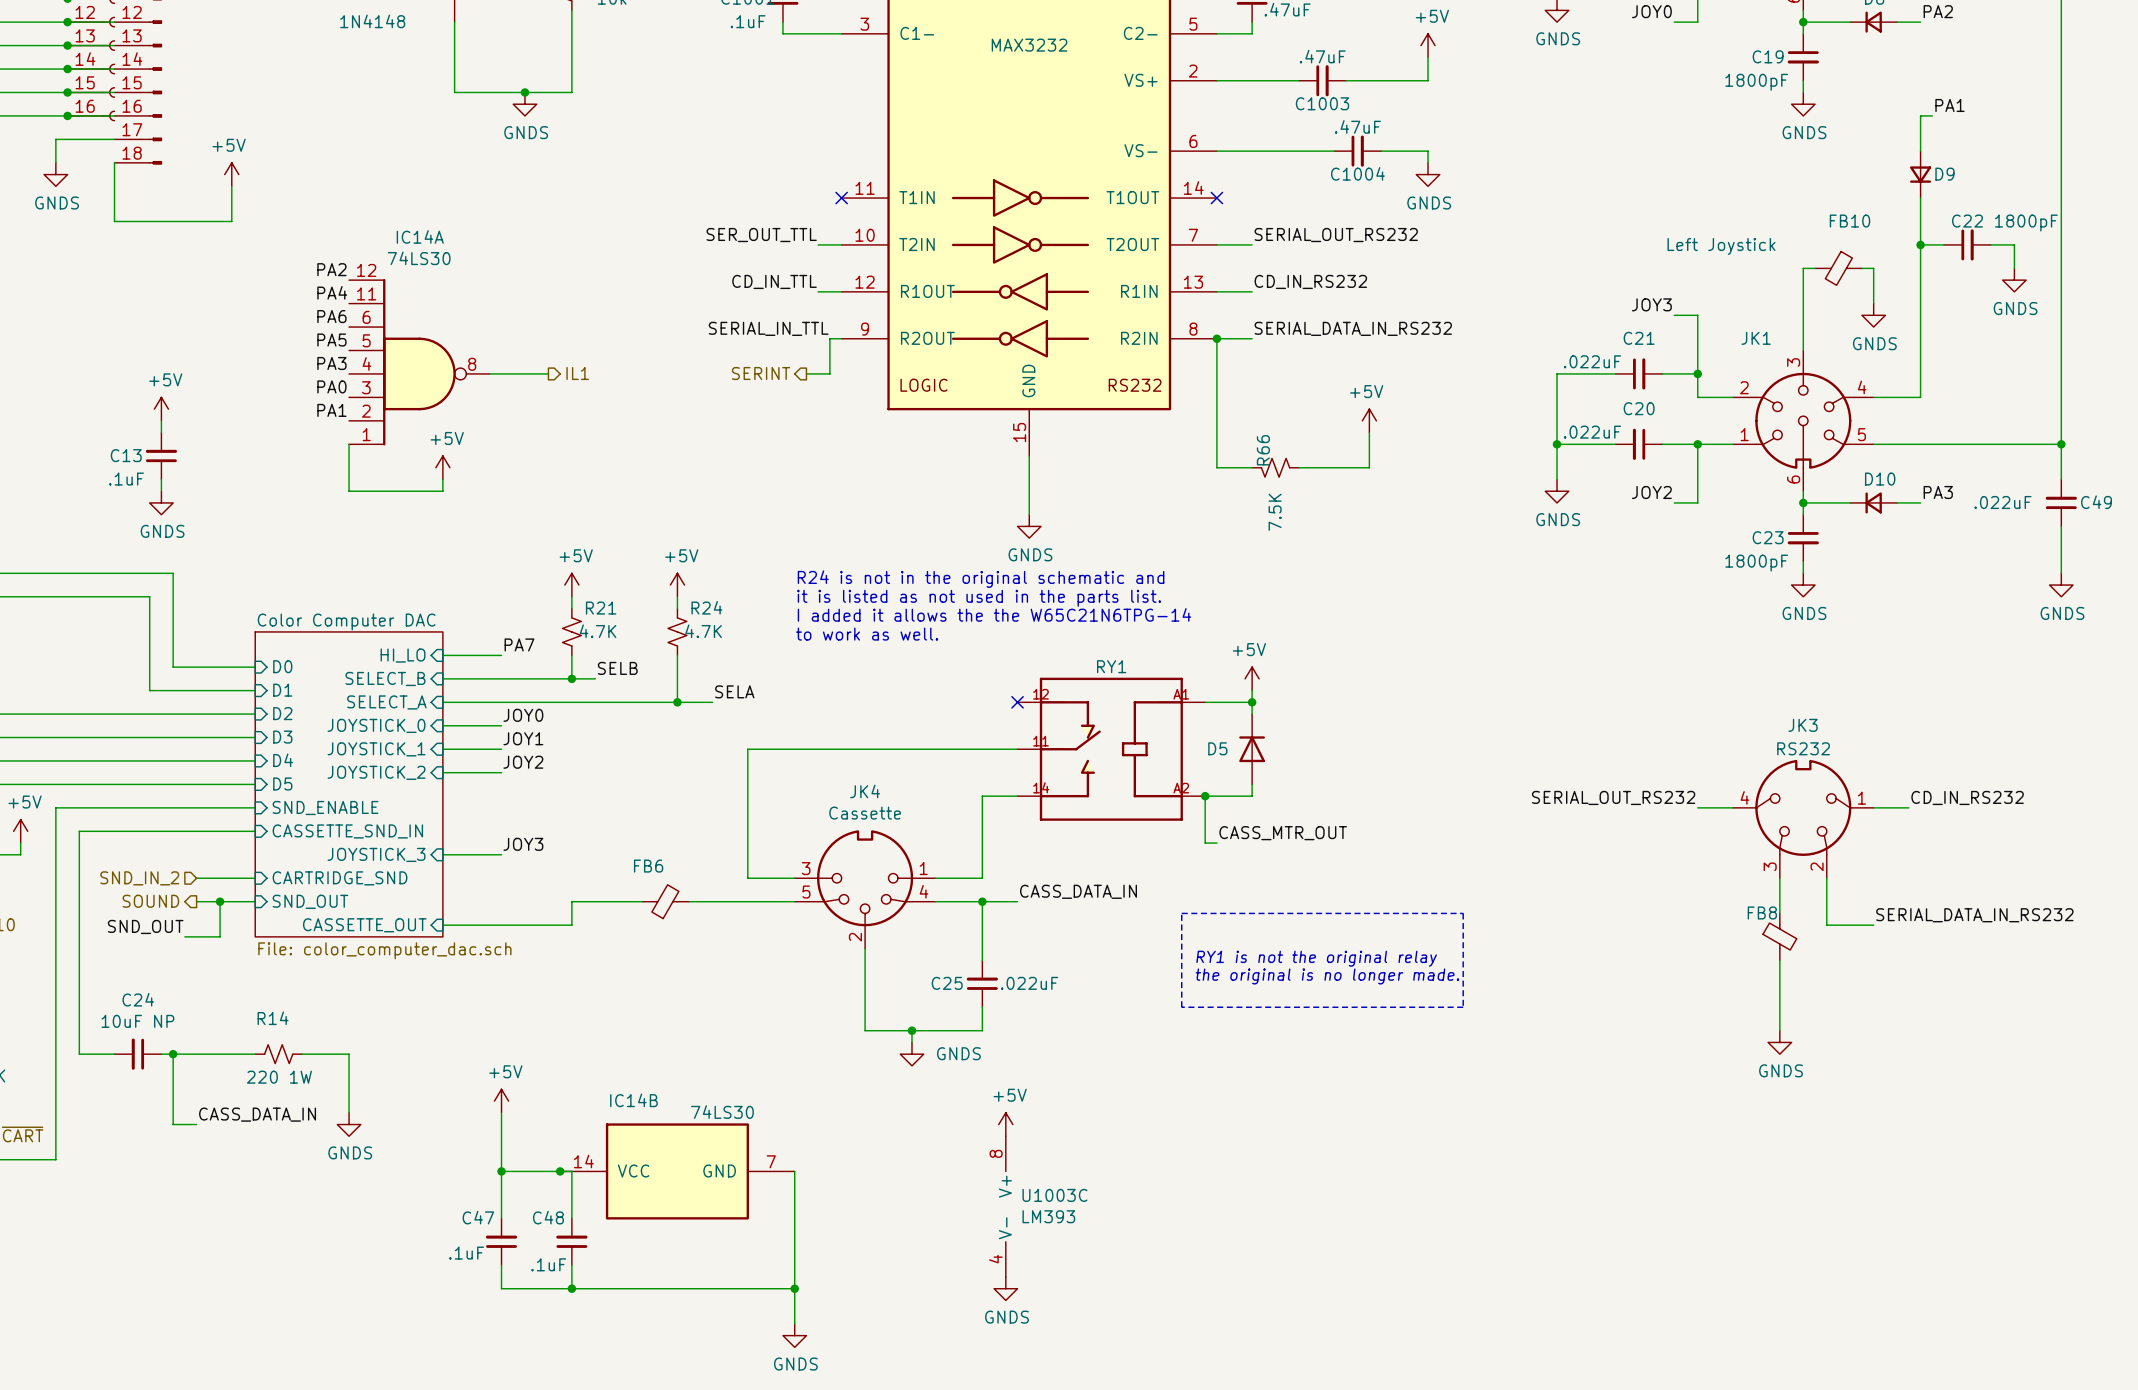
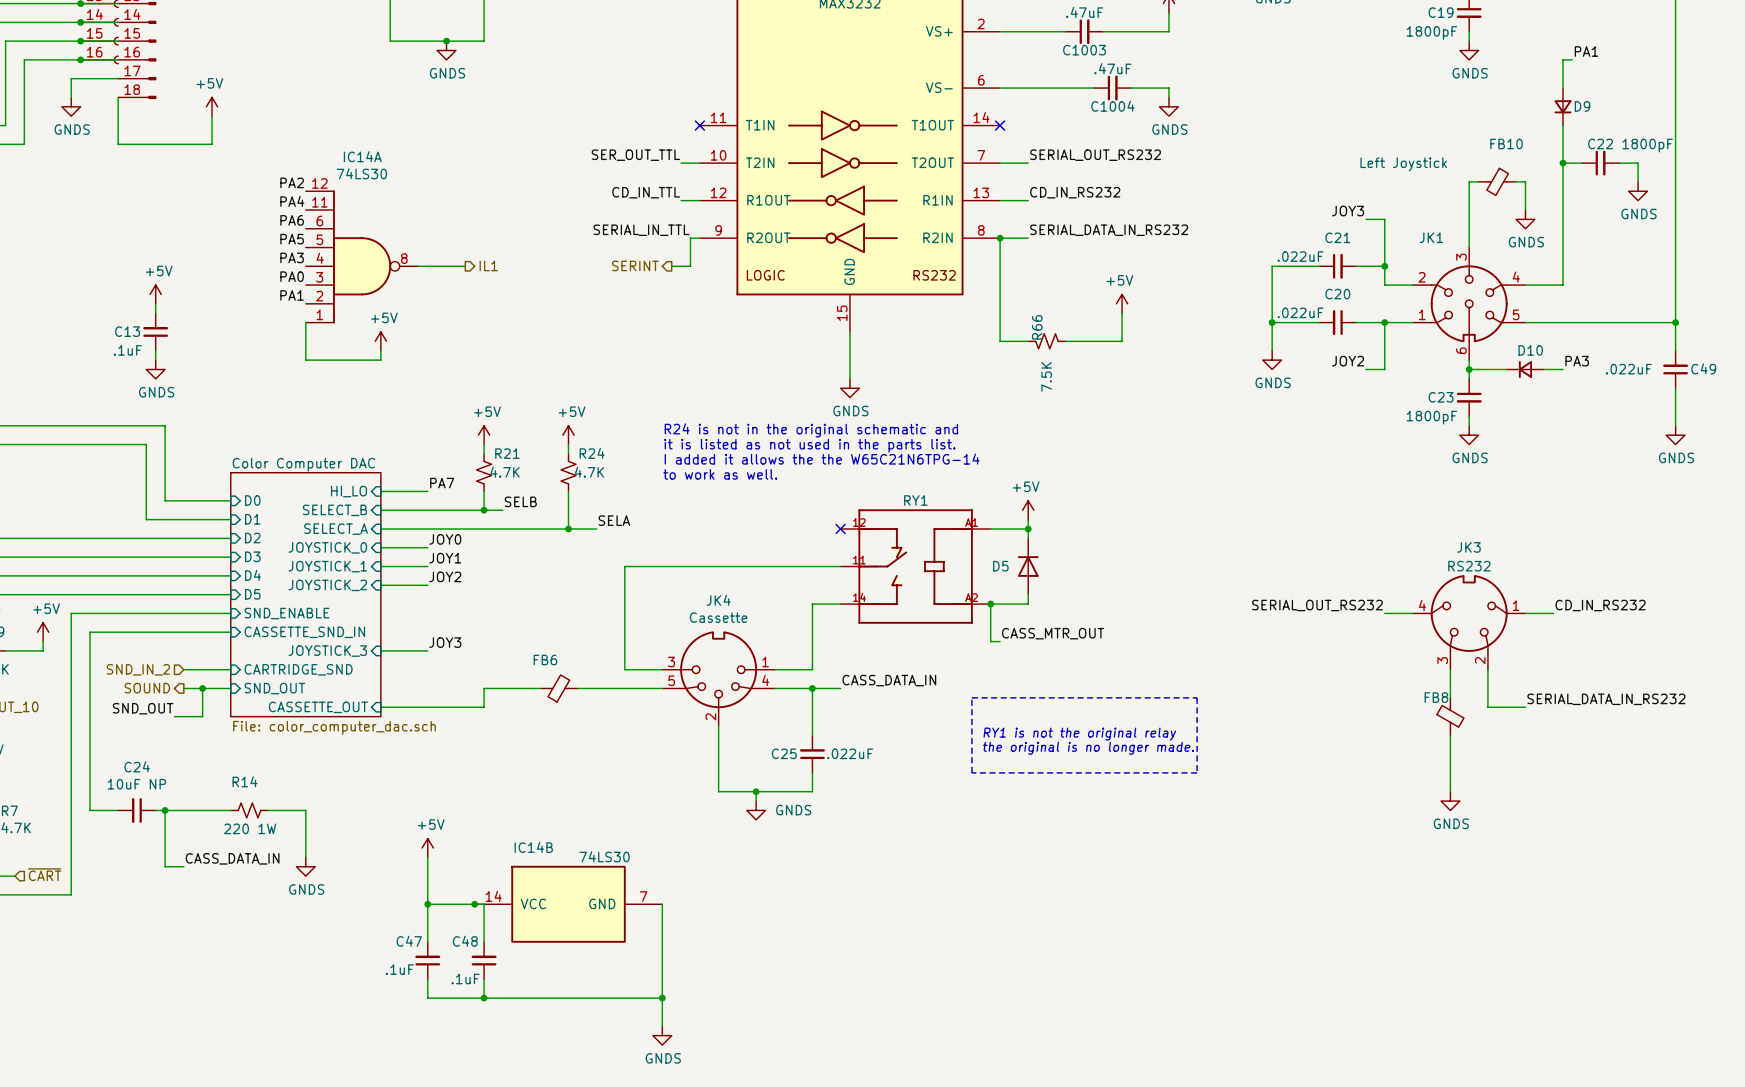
power symbol: +5V (1005, 1124) -> none
U1003C: LM393 (1005, 1206) -> none
power symbol: GNDS (1005, 1288) -> none

